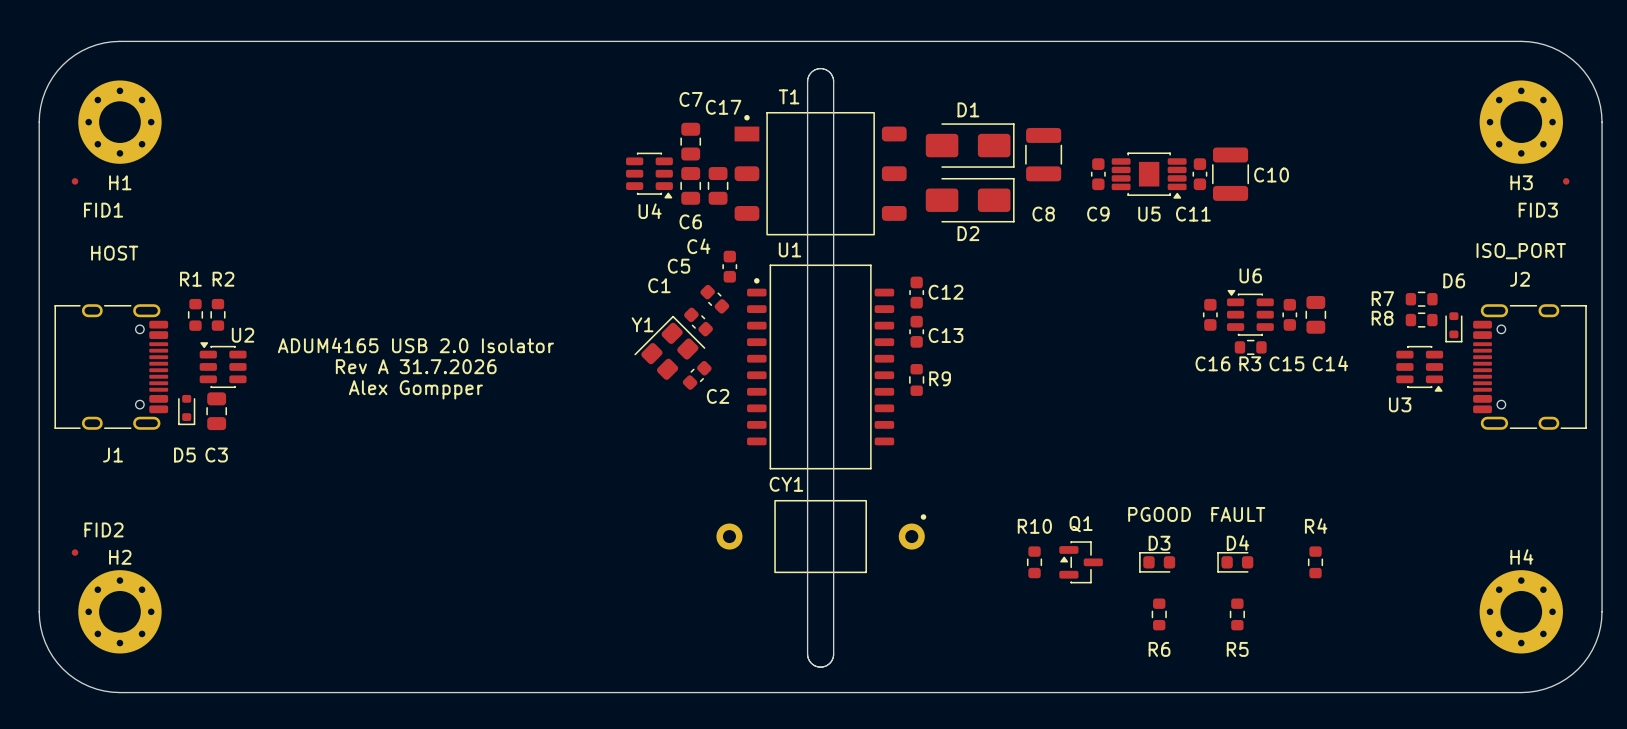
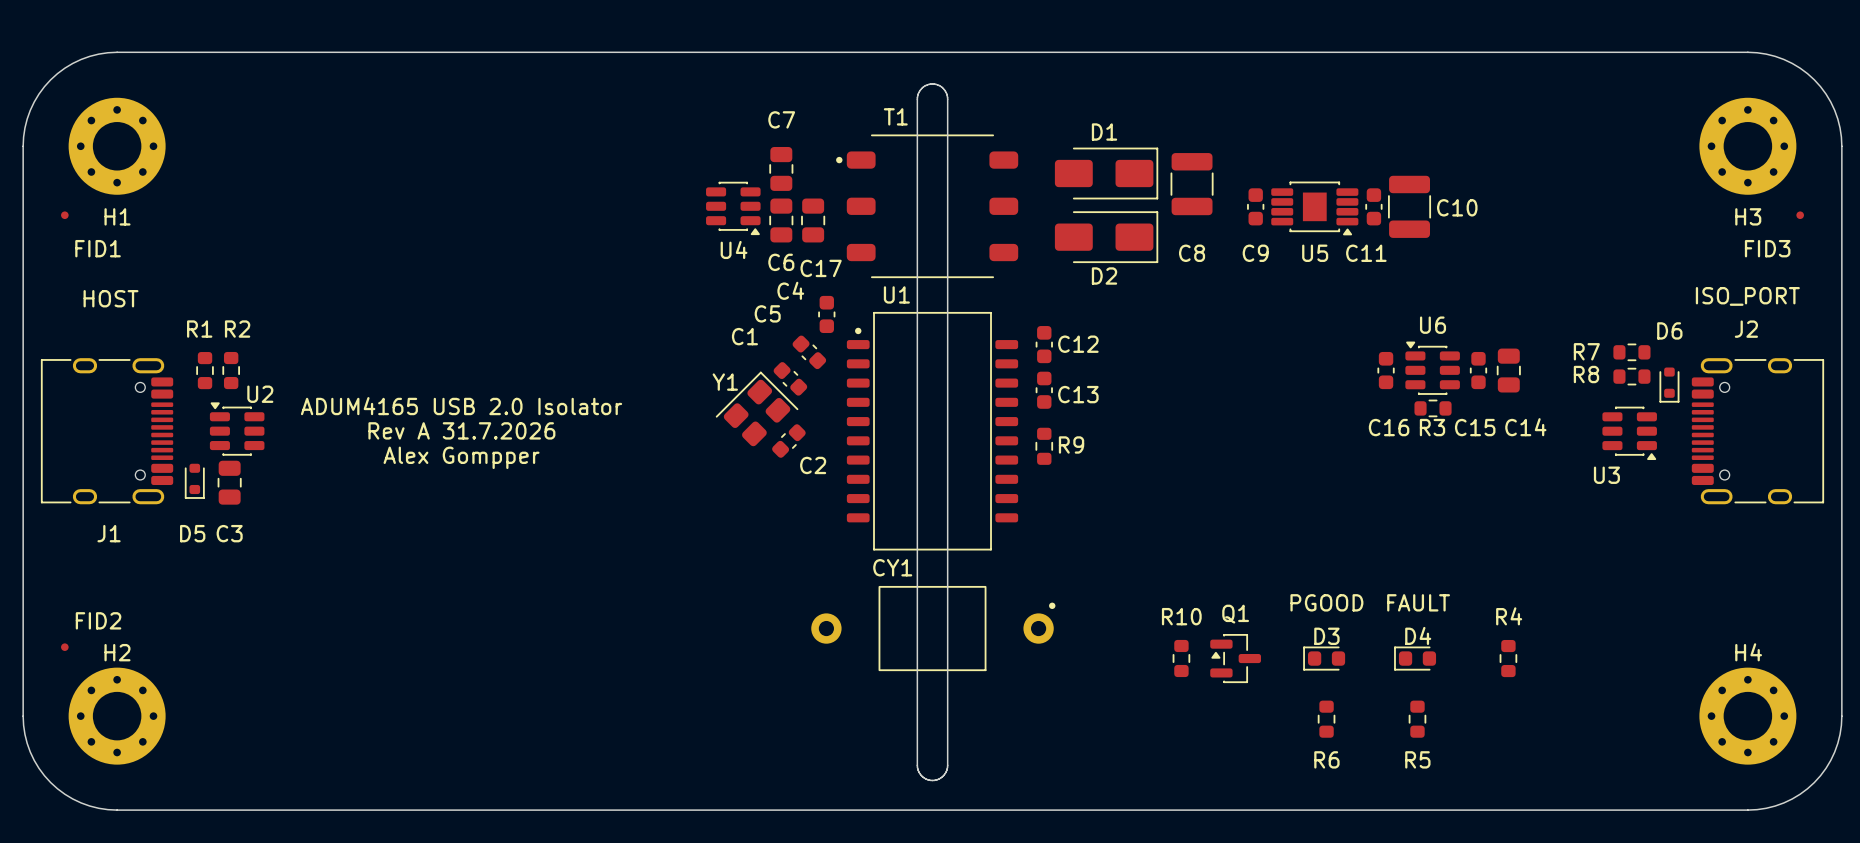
C17 name position: C17 (723, 107) -> C17 (821, 268)
T1 footprint: [734, 111, 907, 236] -> [836, 134, 1019, 279]

